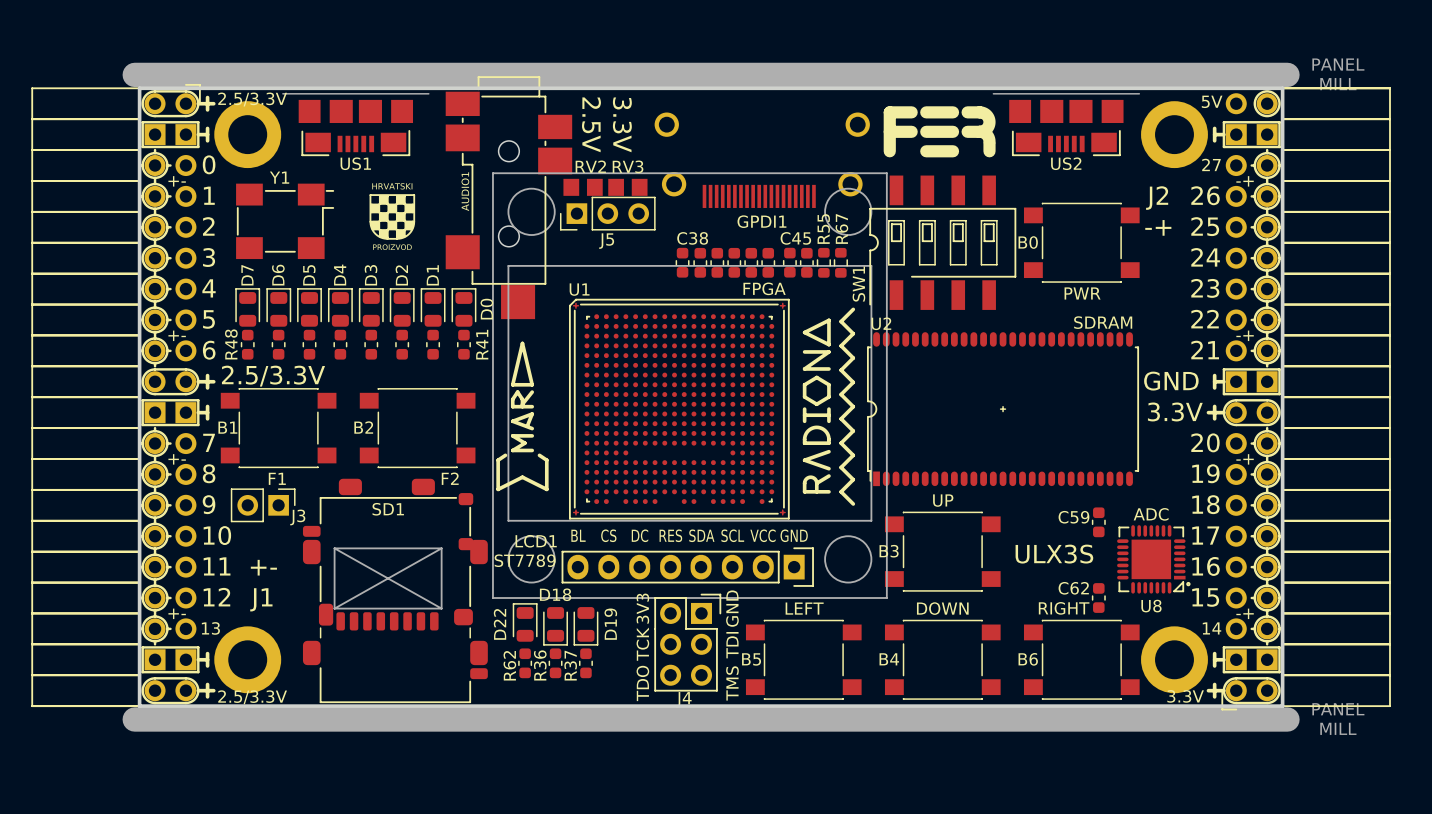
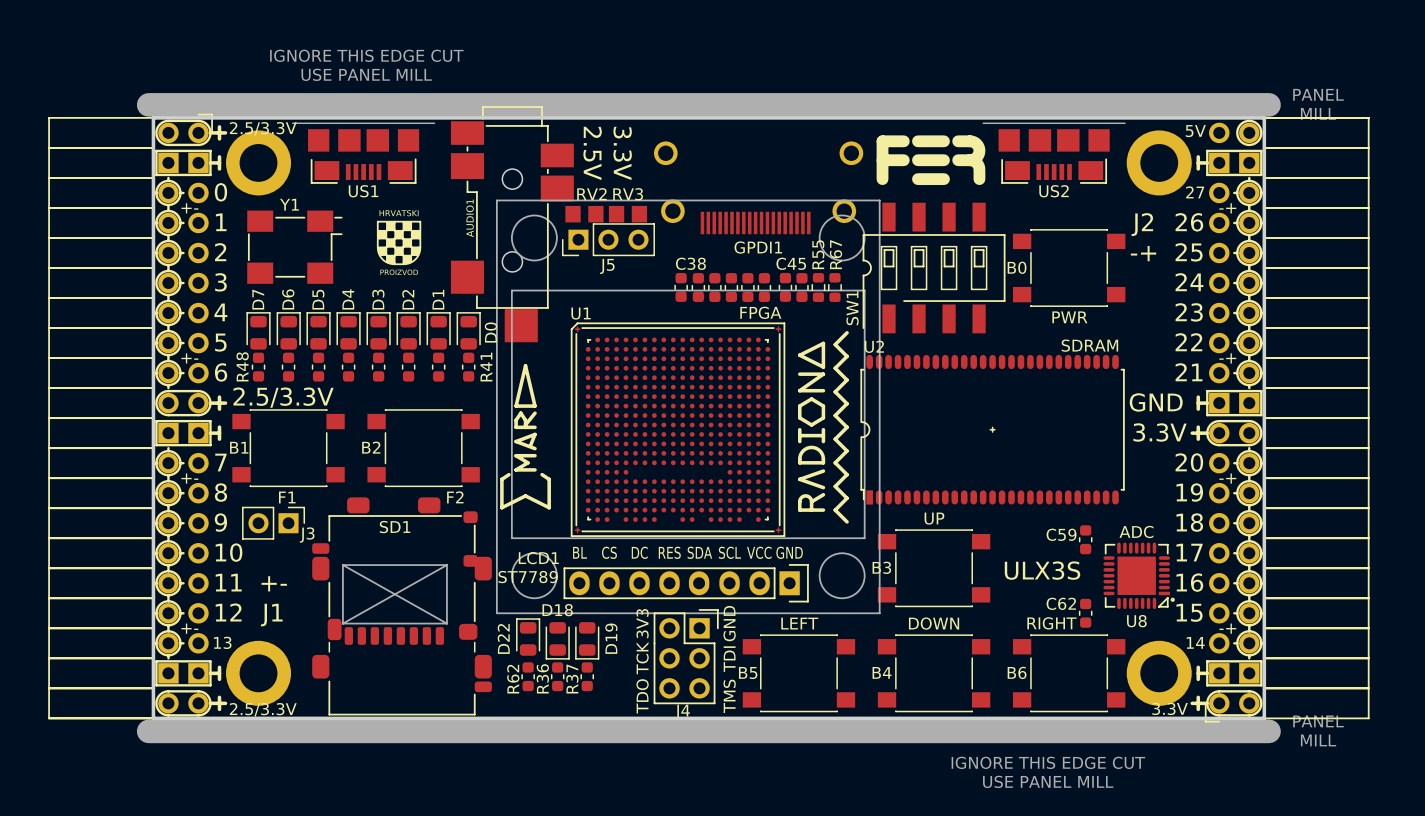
text: none -> IGNORE THIS EDGE CUT (366, 55)
text: none -> USE PANEL MILL (366, 74)
text: none -> IGNORE THIS EDGE CUT (1048, 762)
text: none -> USE PANEL MILL (1048, 781)

